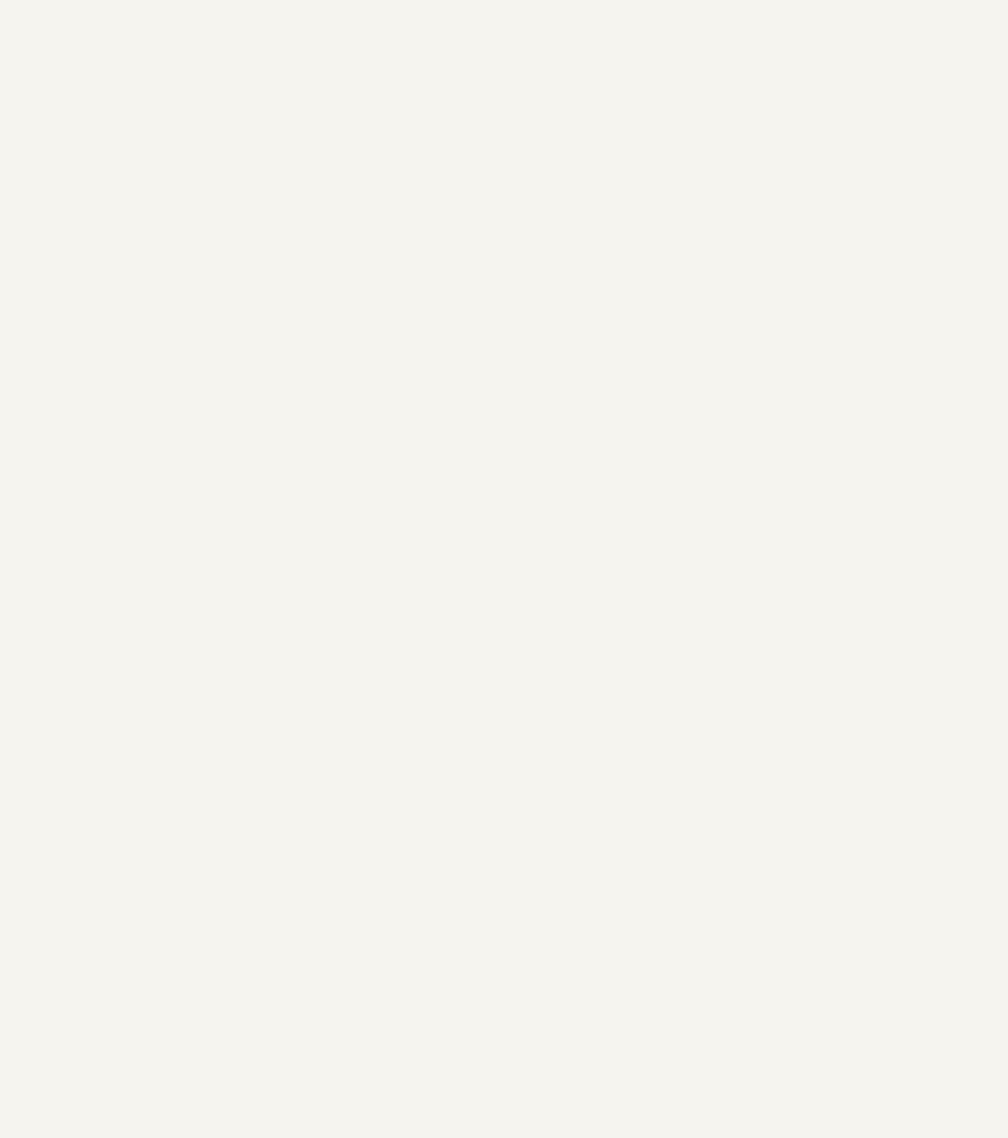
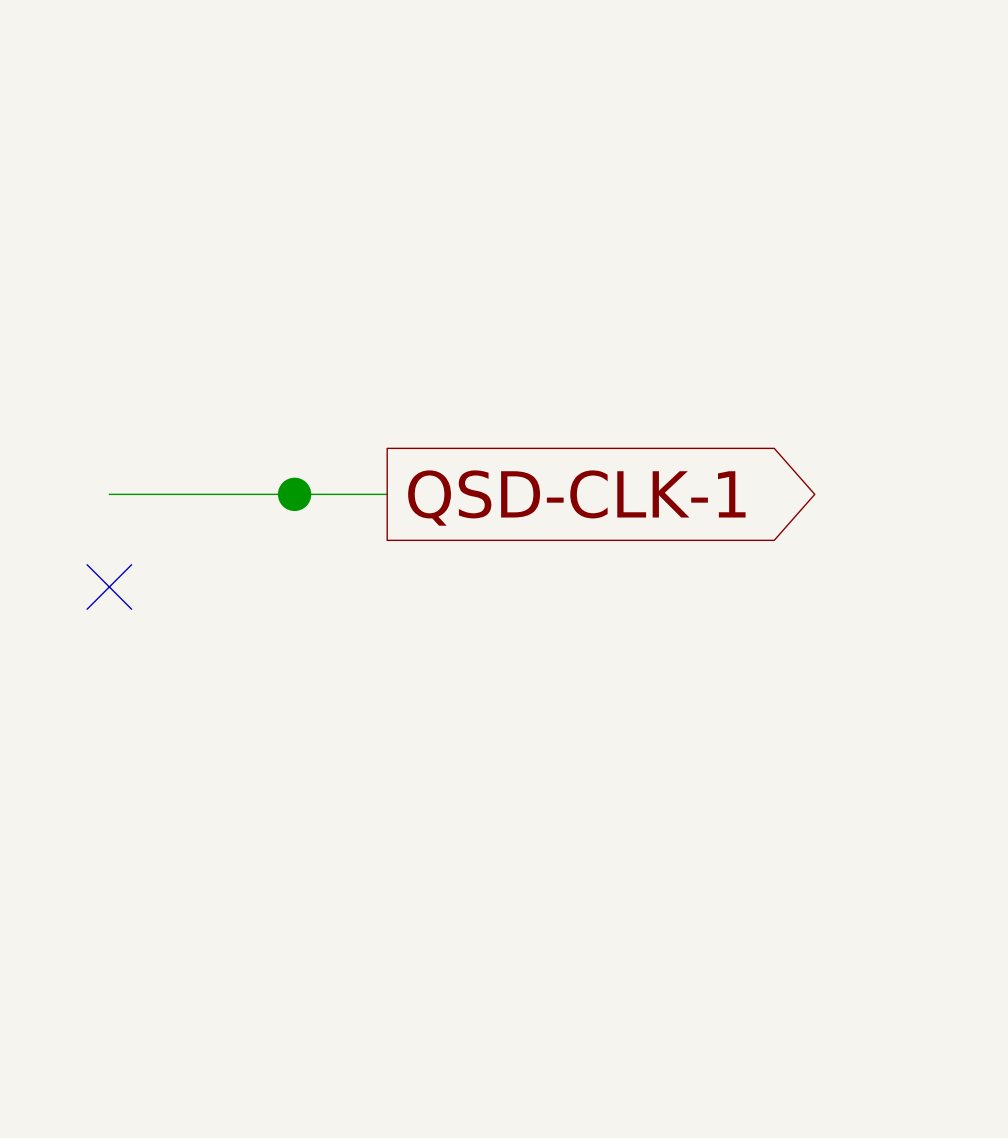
wire: none -> (109, 494) (387, 494)
junction: none -> (294, 494)
global label: none -> QSD-CLK-1 (576, 498)
no-connect mark: none -> (109, 586)

